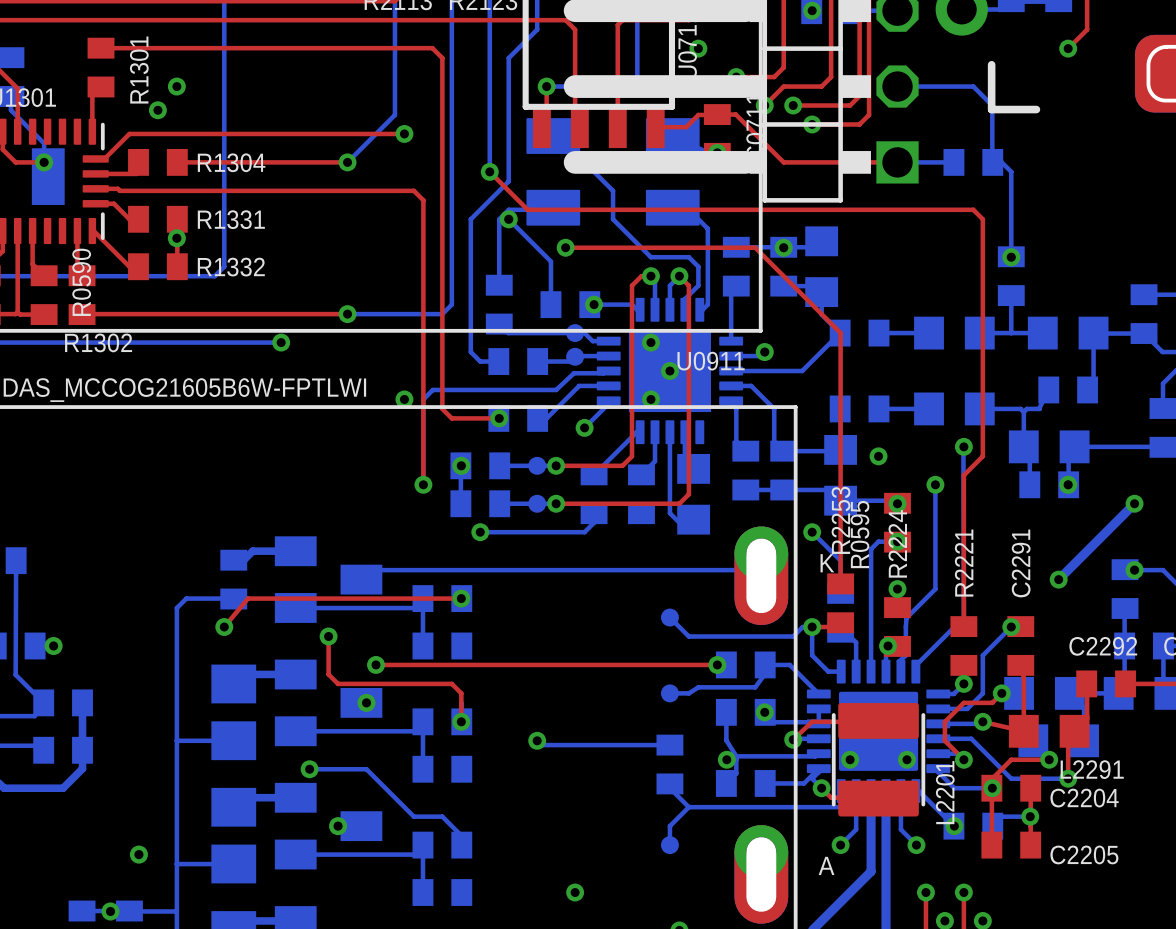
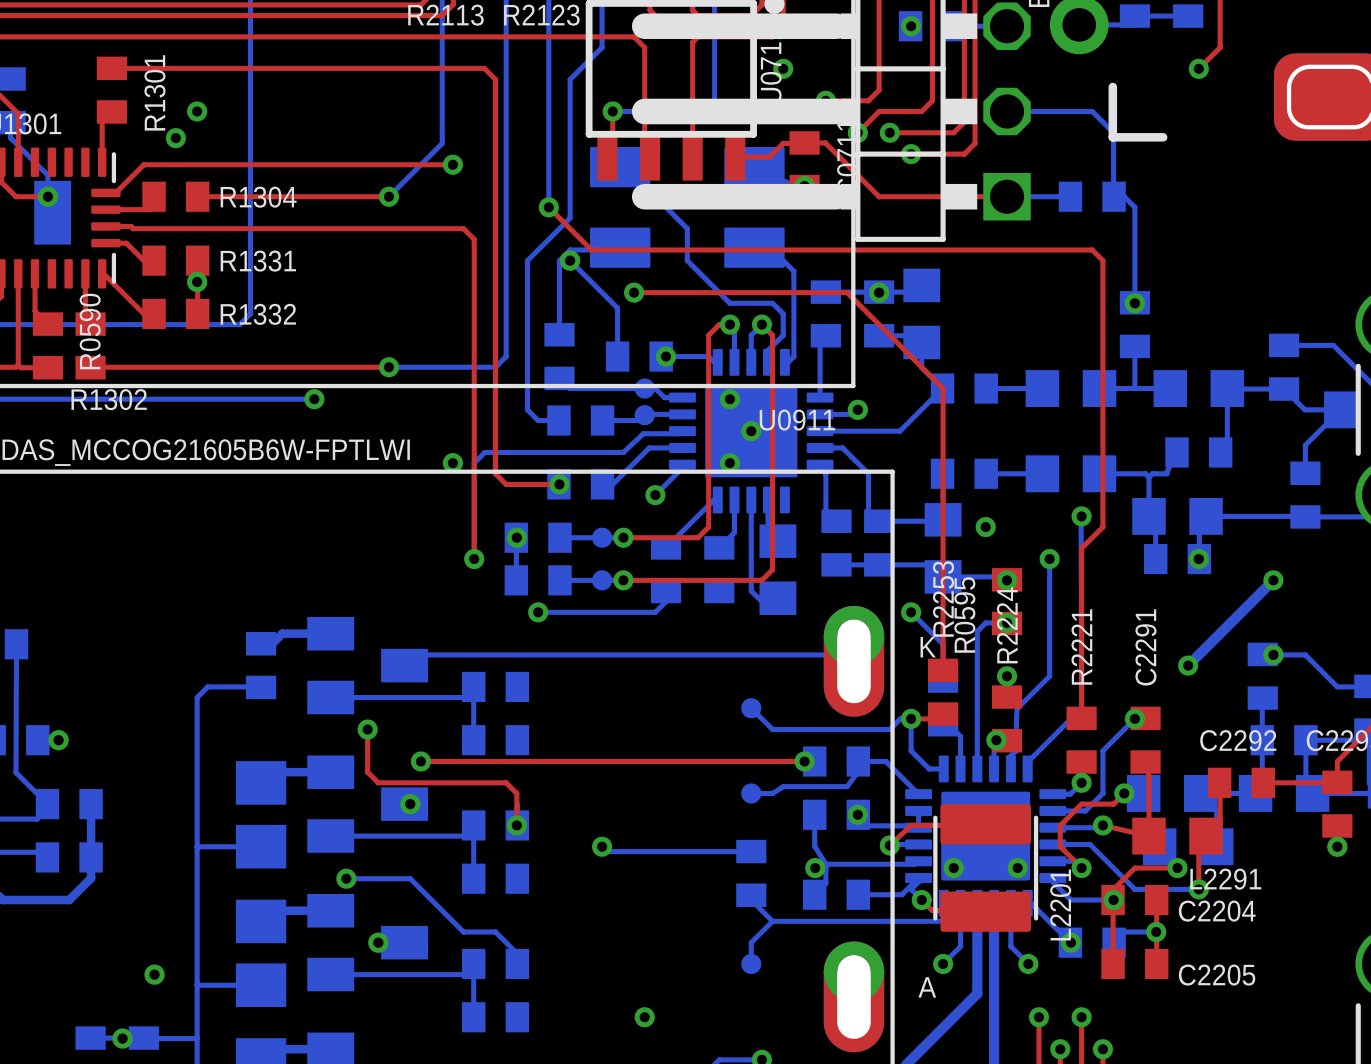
top track: (461, 598) (247, 598) (224, 627) -> none
via: (461, 598) -> none
via: (224, 627) -> none

